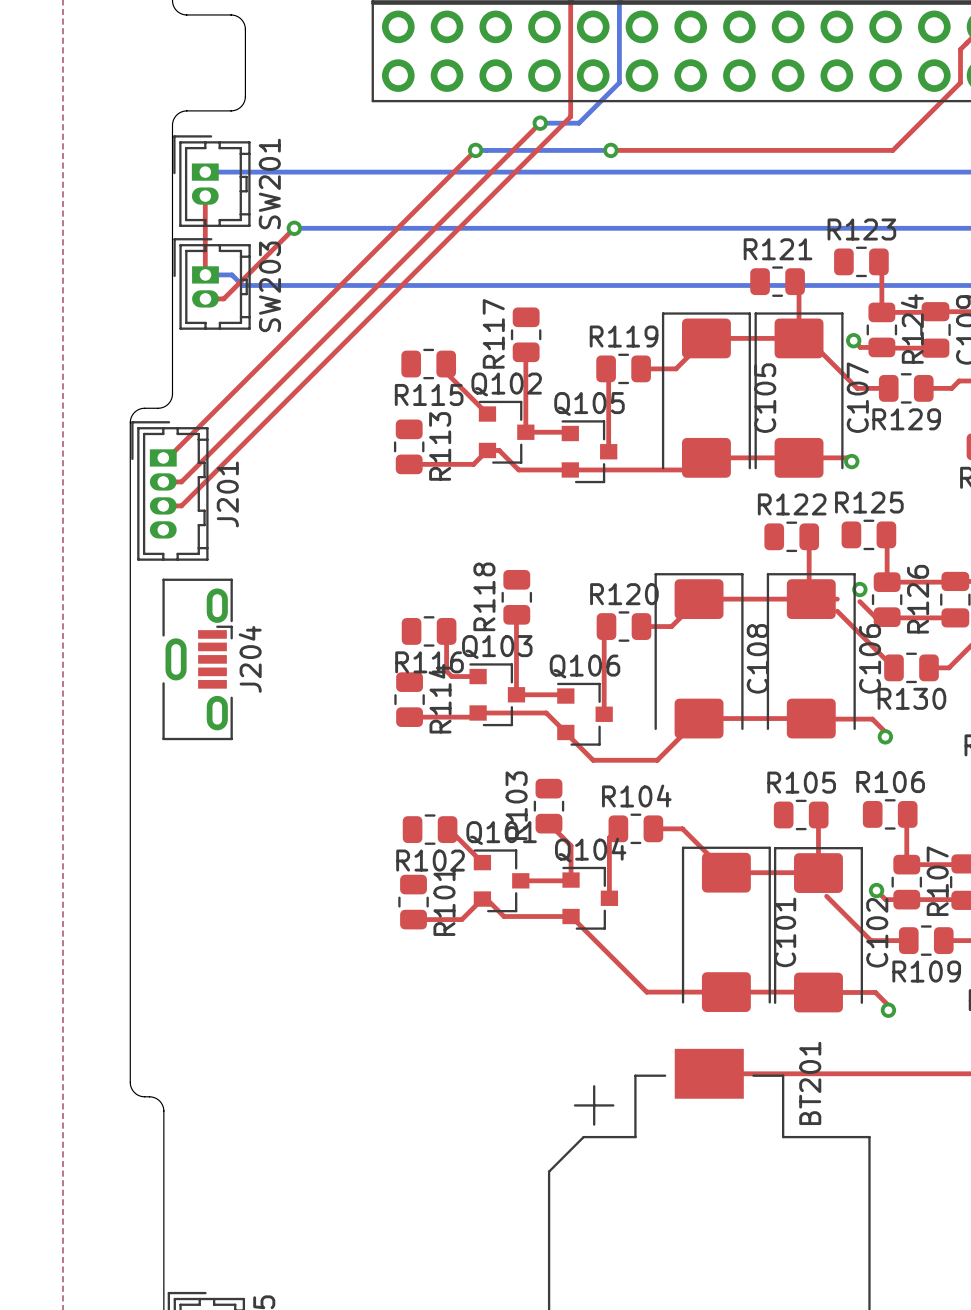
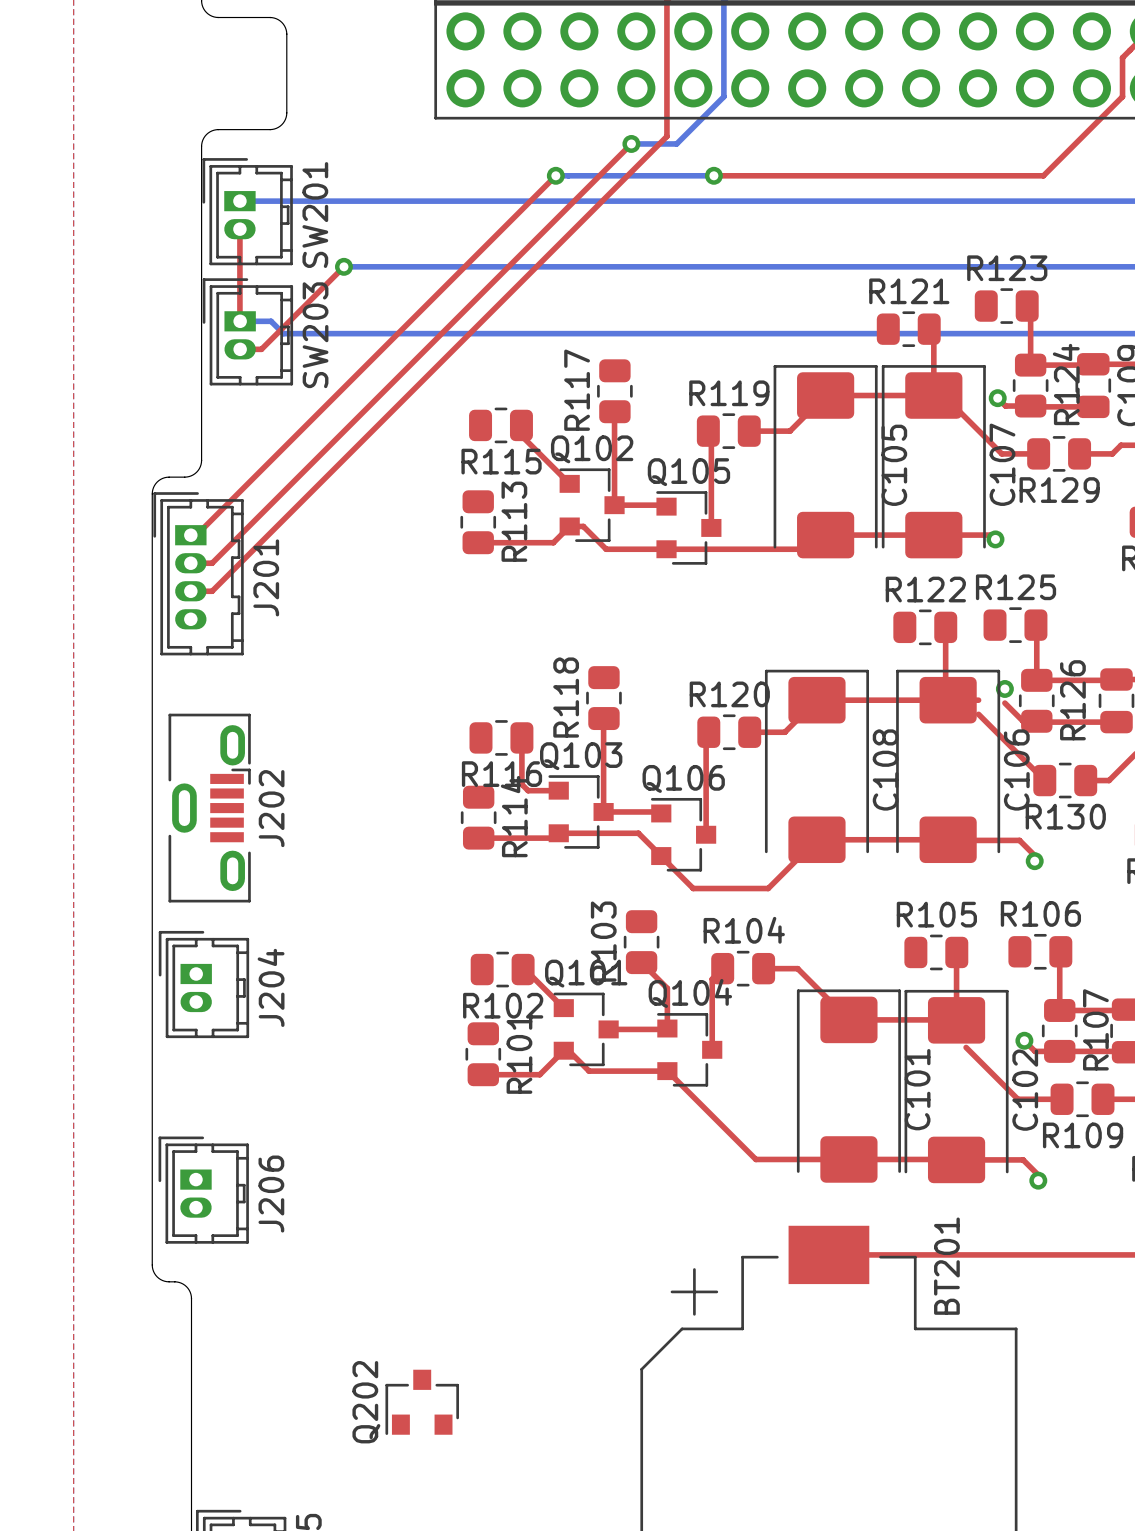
J204 footprint: [162, 578, 233, 741] -> [158, 930, 250, 1039]
J202: none -> (209, 808)
J206: none -> (203, 1190)
Q202: none -> (422, 1402)

